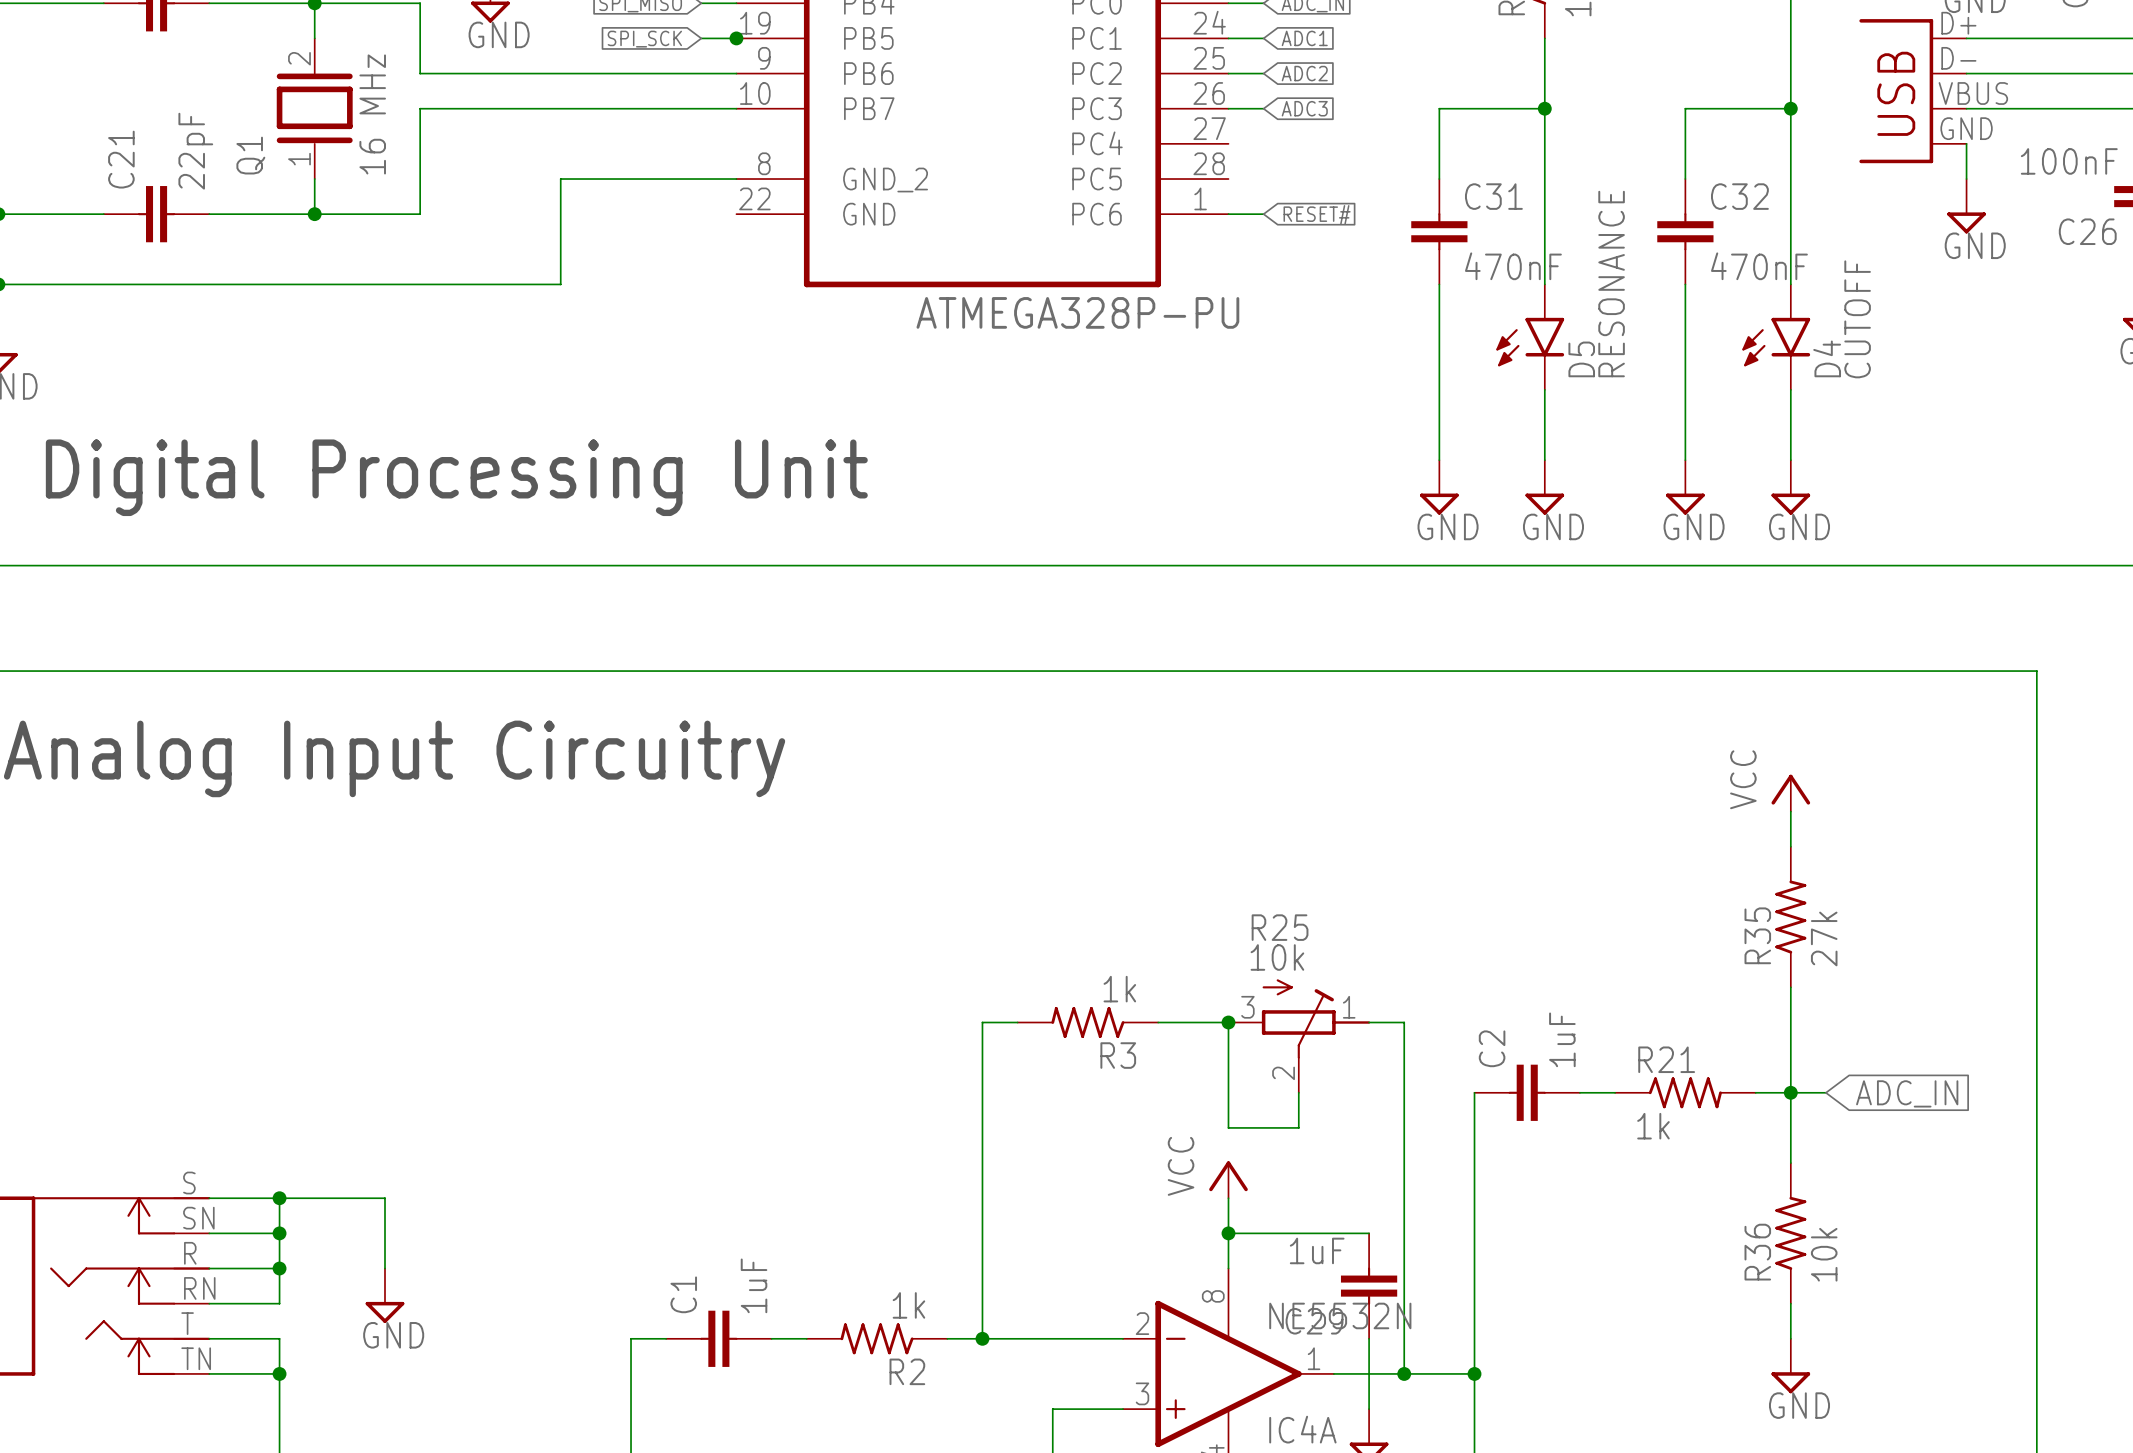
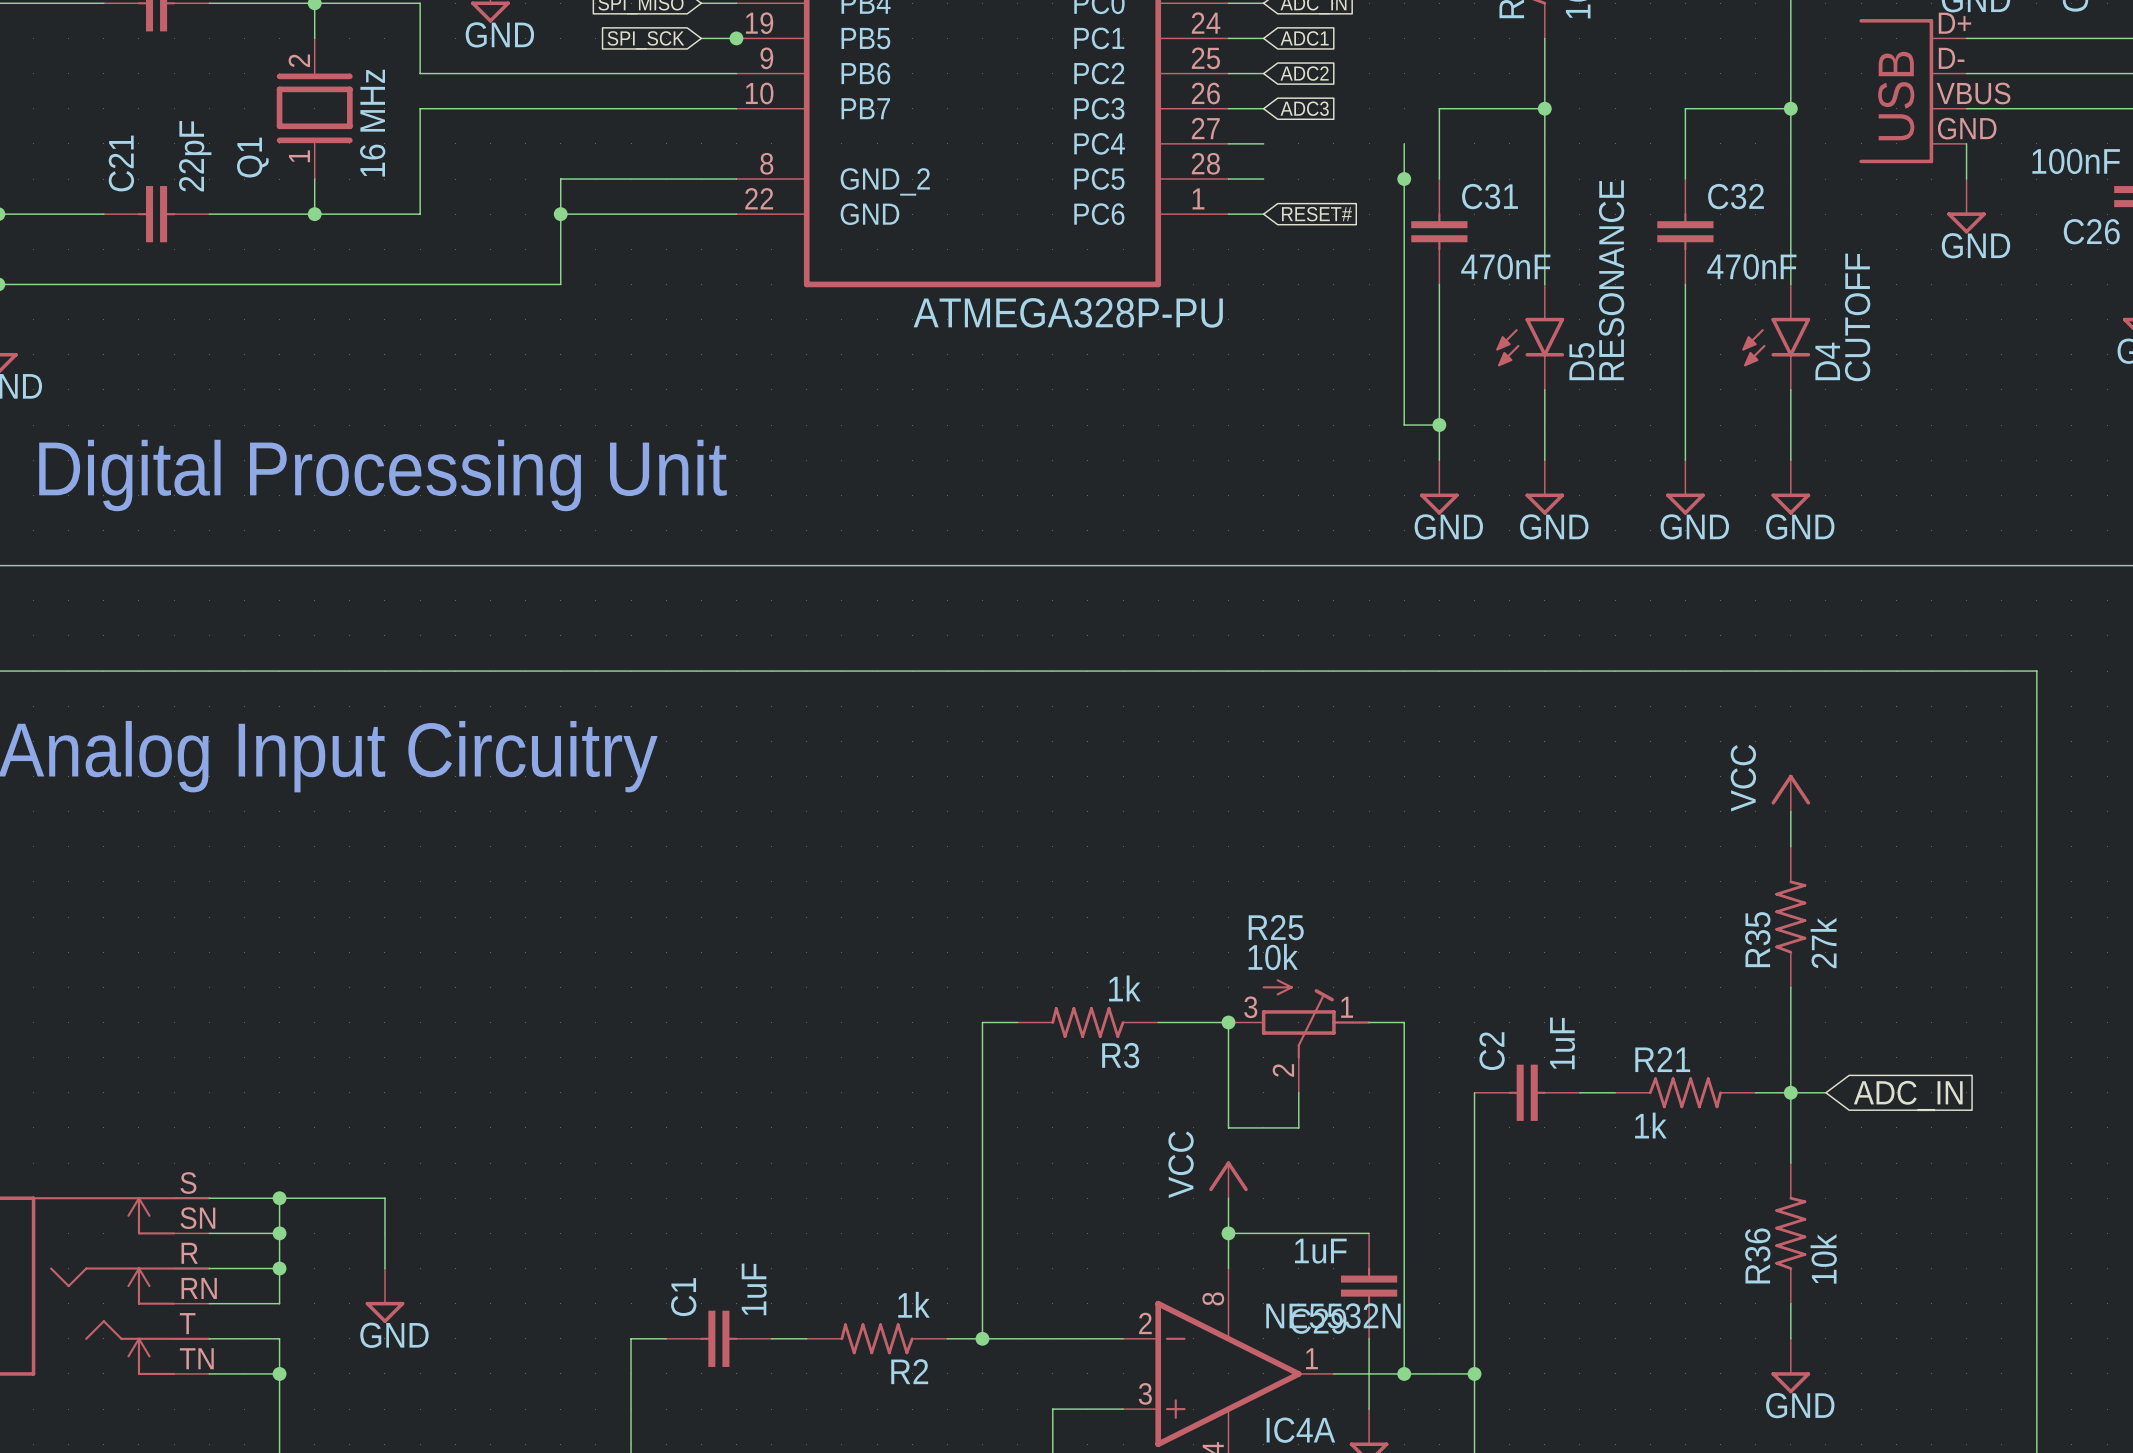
wire: none -> (1228, 143) (1263, 143)
wire: none -> (1404, 143) (1404, 425) (1439, 425)
wire: none -> (1228, 179) (1263, 179)
junction: none -> (1404, 179)
wire: none -> (560, 214) (736, 214)
junction: none -> (560, 214)
junction: none -> (1439, 425)

